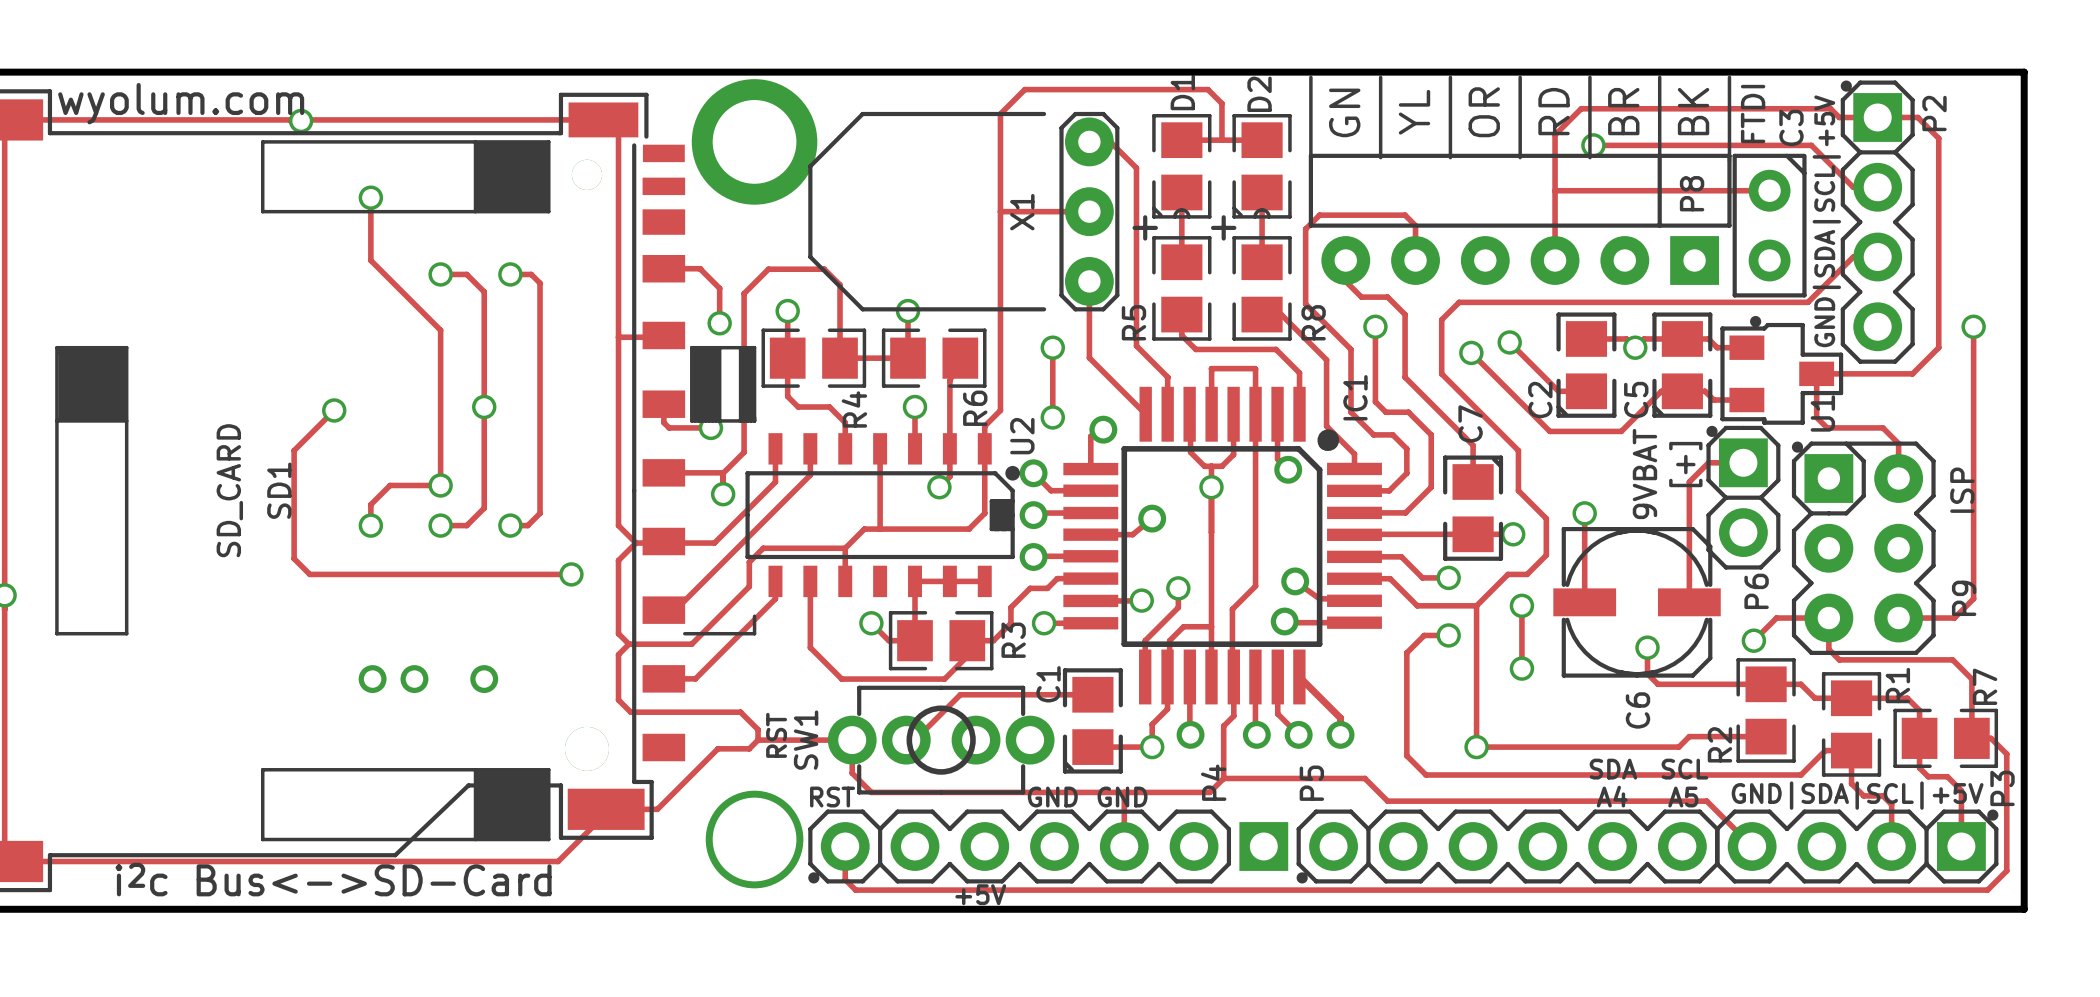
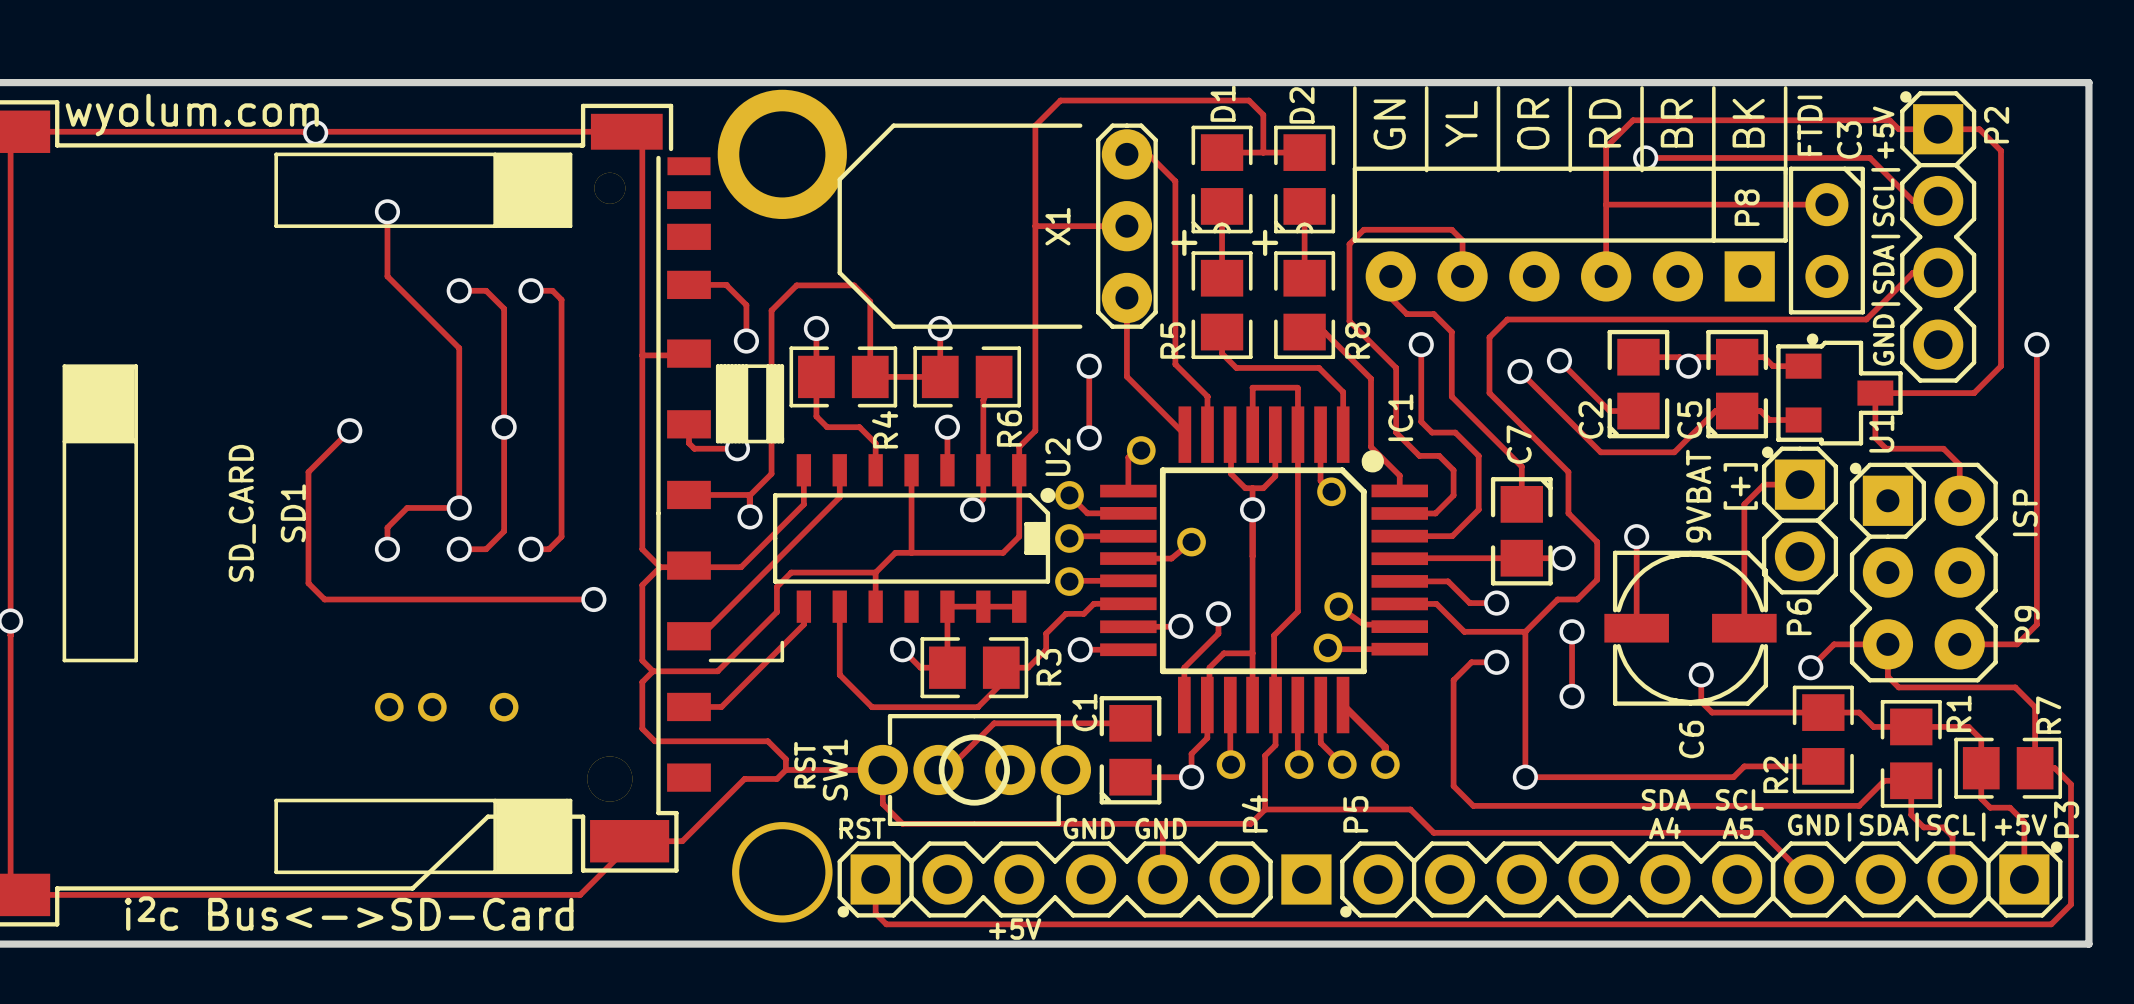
P6 name position: P6 (1756, 591) -> P6 (1799, 616)
P4 footprint: [808, 809, 1232, 884] -> [837, 841, 1273, 918]

